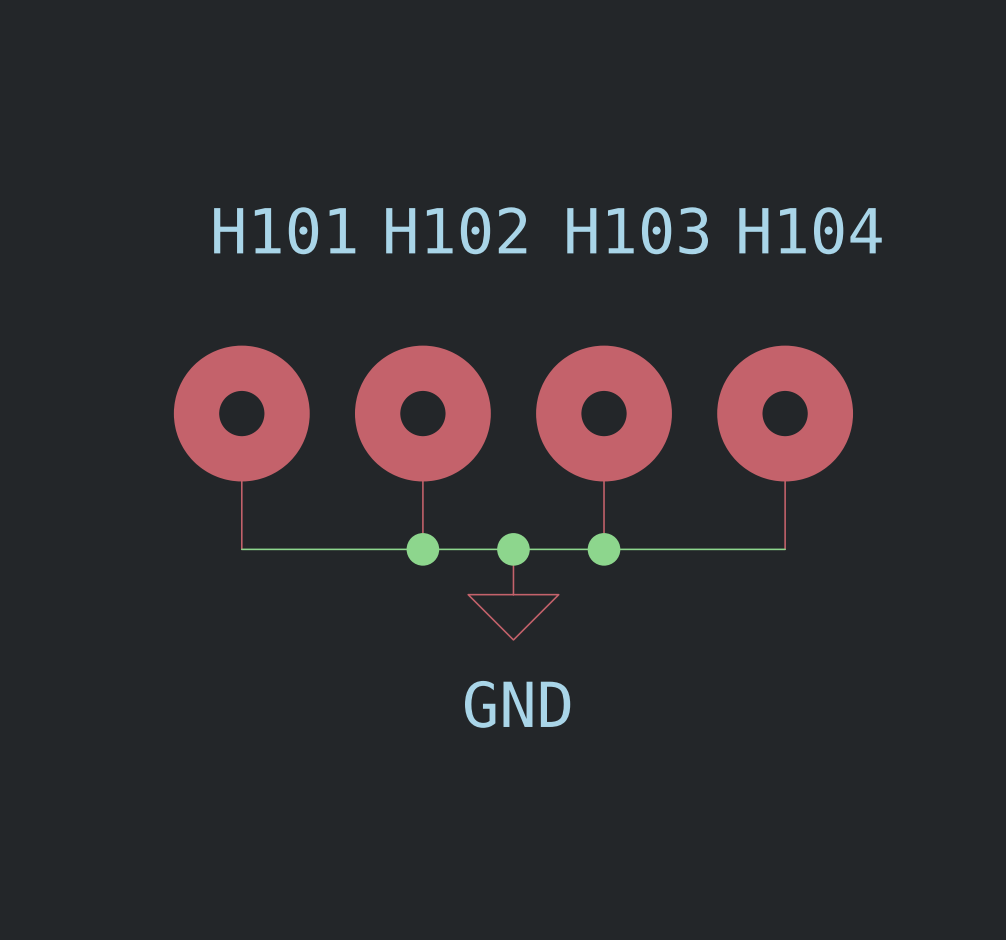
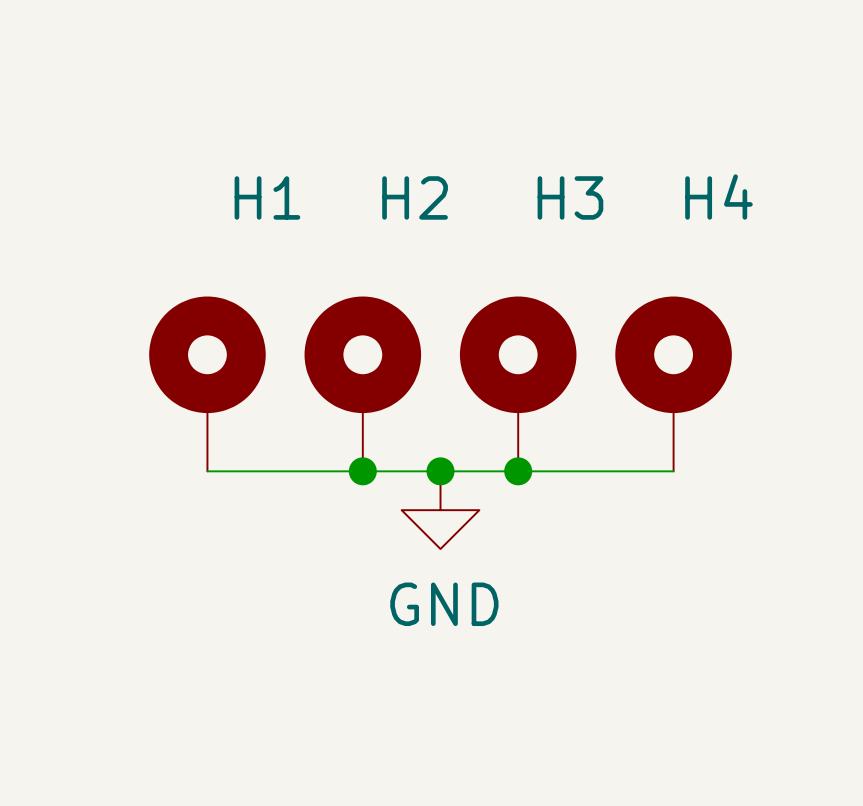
H101 name: H101 (284, 230) -> H1 (267, 197)
H102 name: H102 (456, 230) -> H2 (415, 197)
H103 name: H103 (637, 230) -> H3 (570, 197)
H104 name: H104 (810, 230) -> H4 (718, 197)

